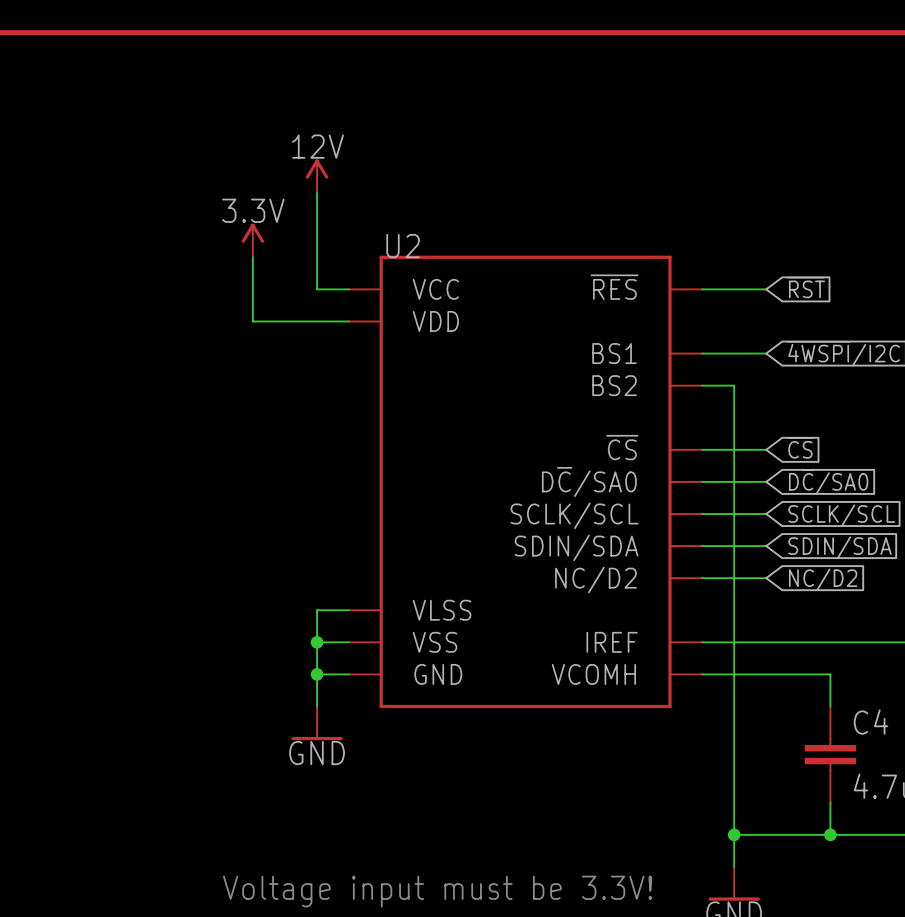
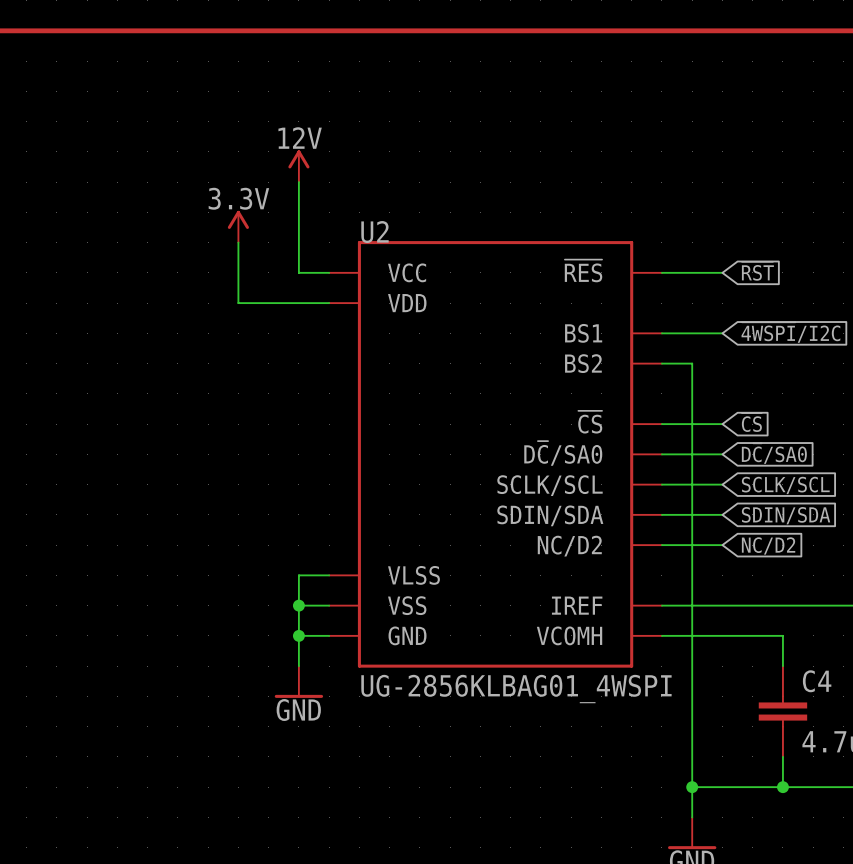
U2 value: none -> UG-2856KLBAG01_4WSPI (516, 689)
text: Voltage input must be 3.3V! (437, 891) -> none

